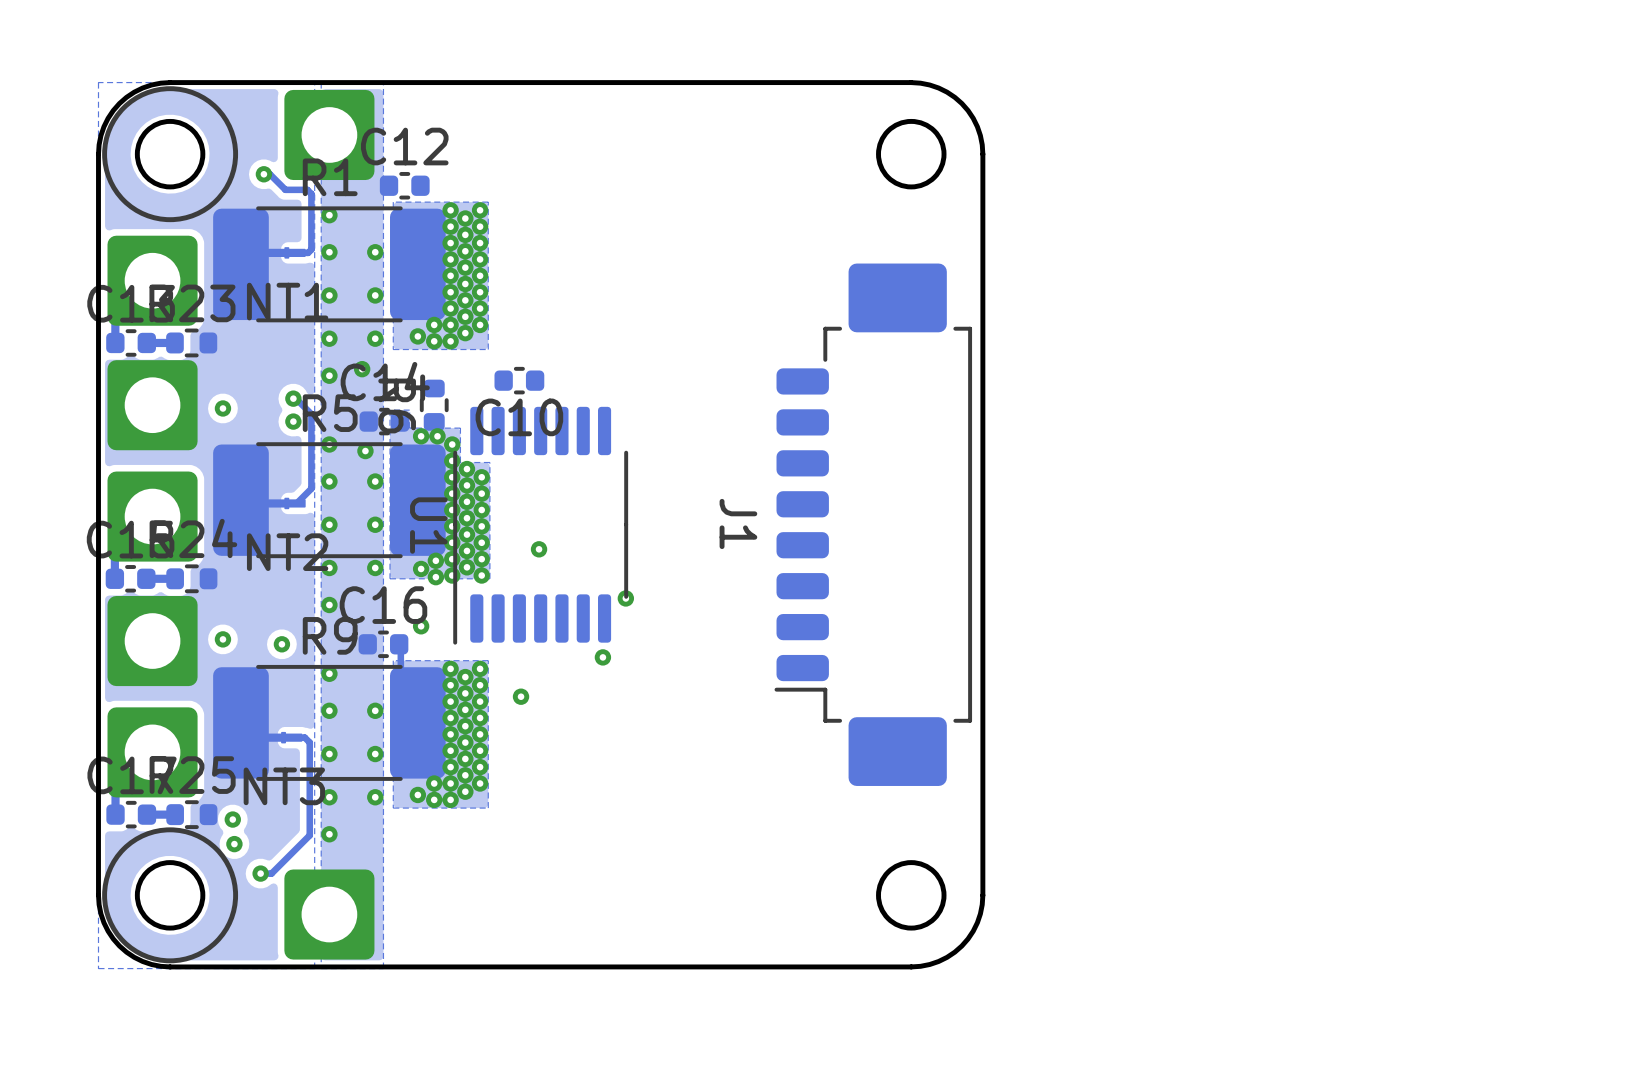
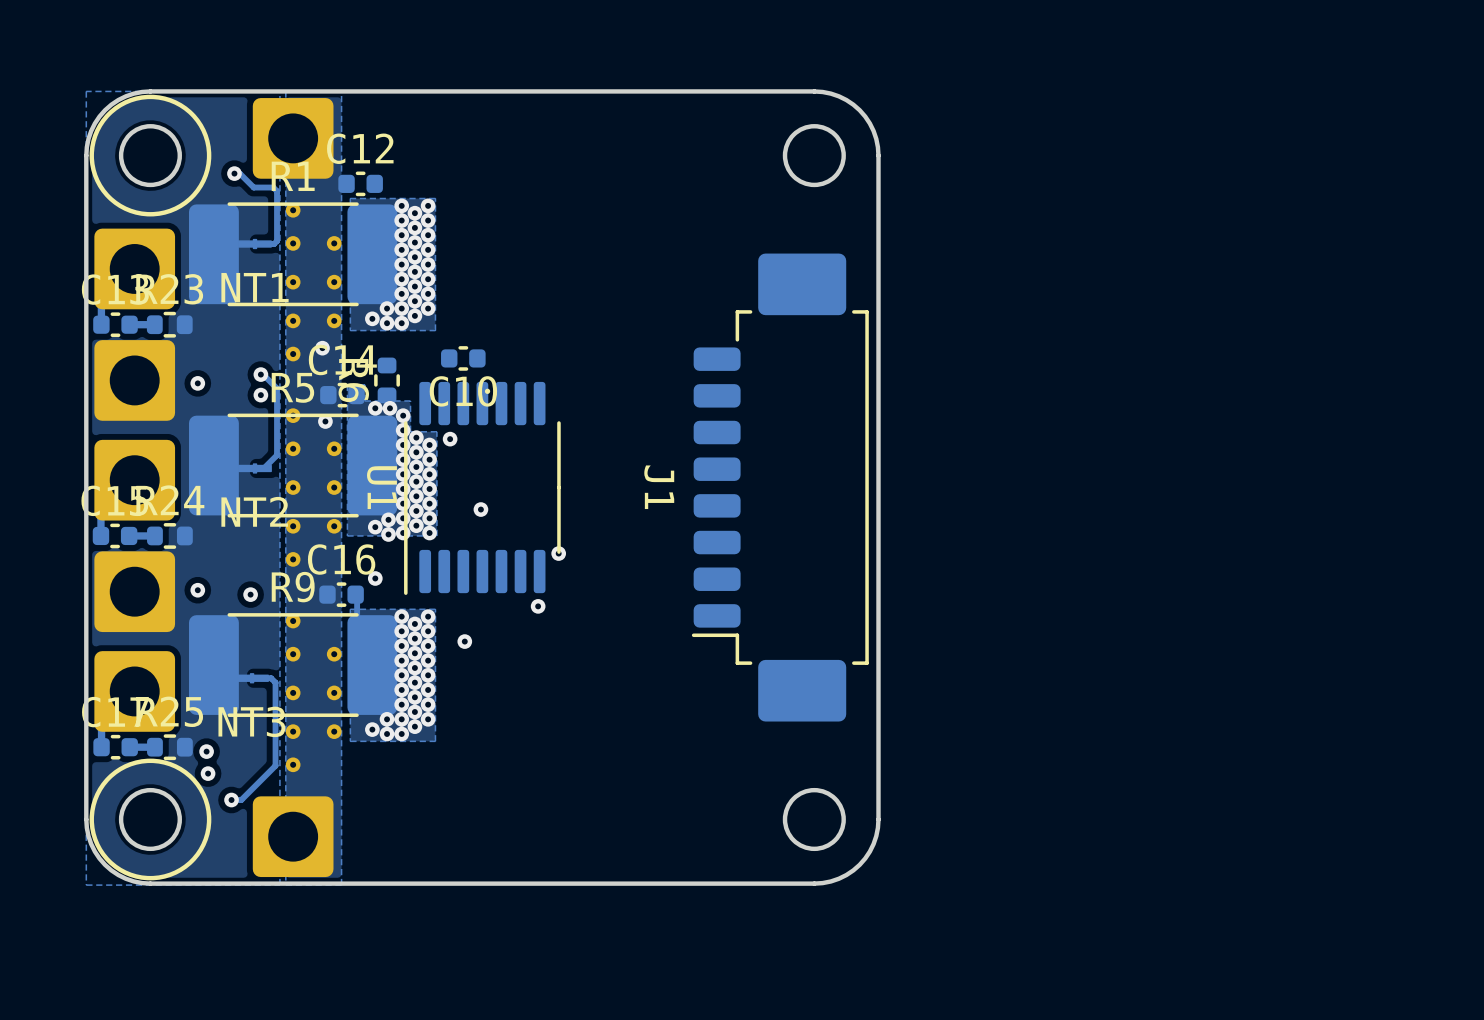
via: none -> (450, 439)

